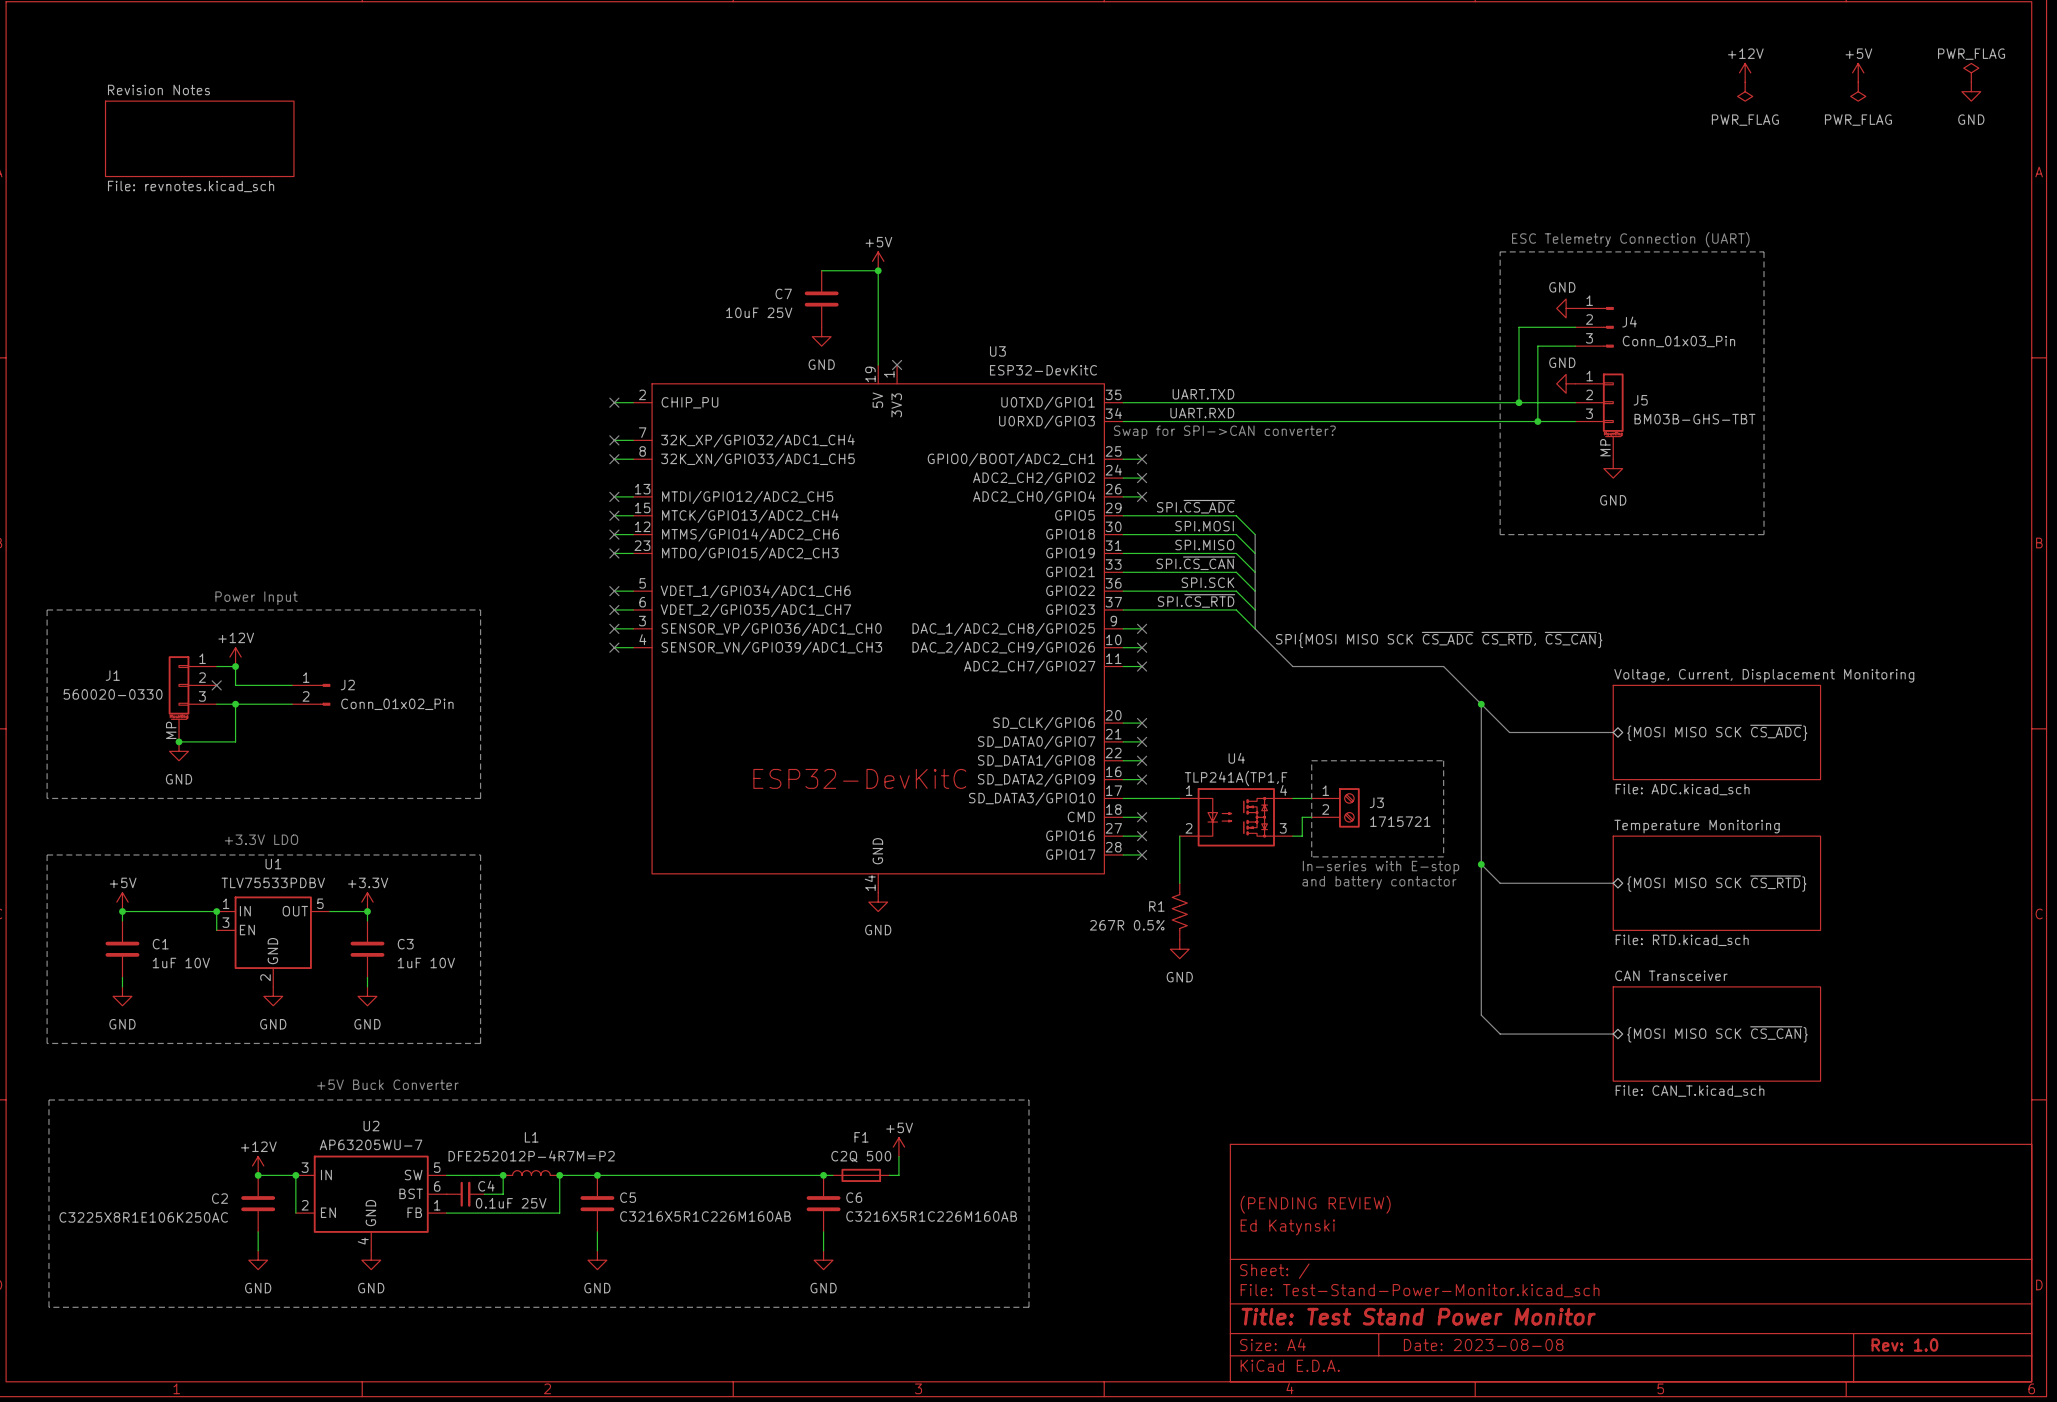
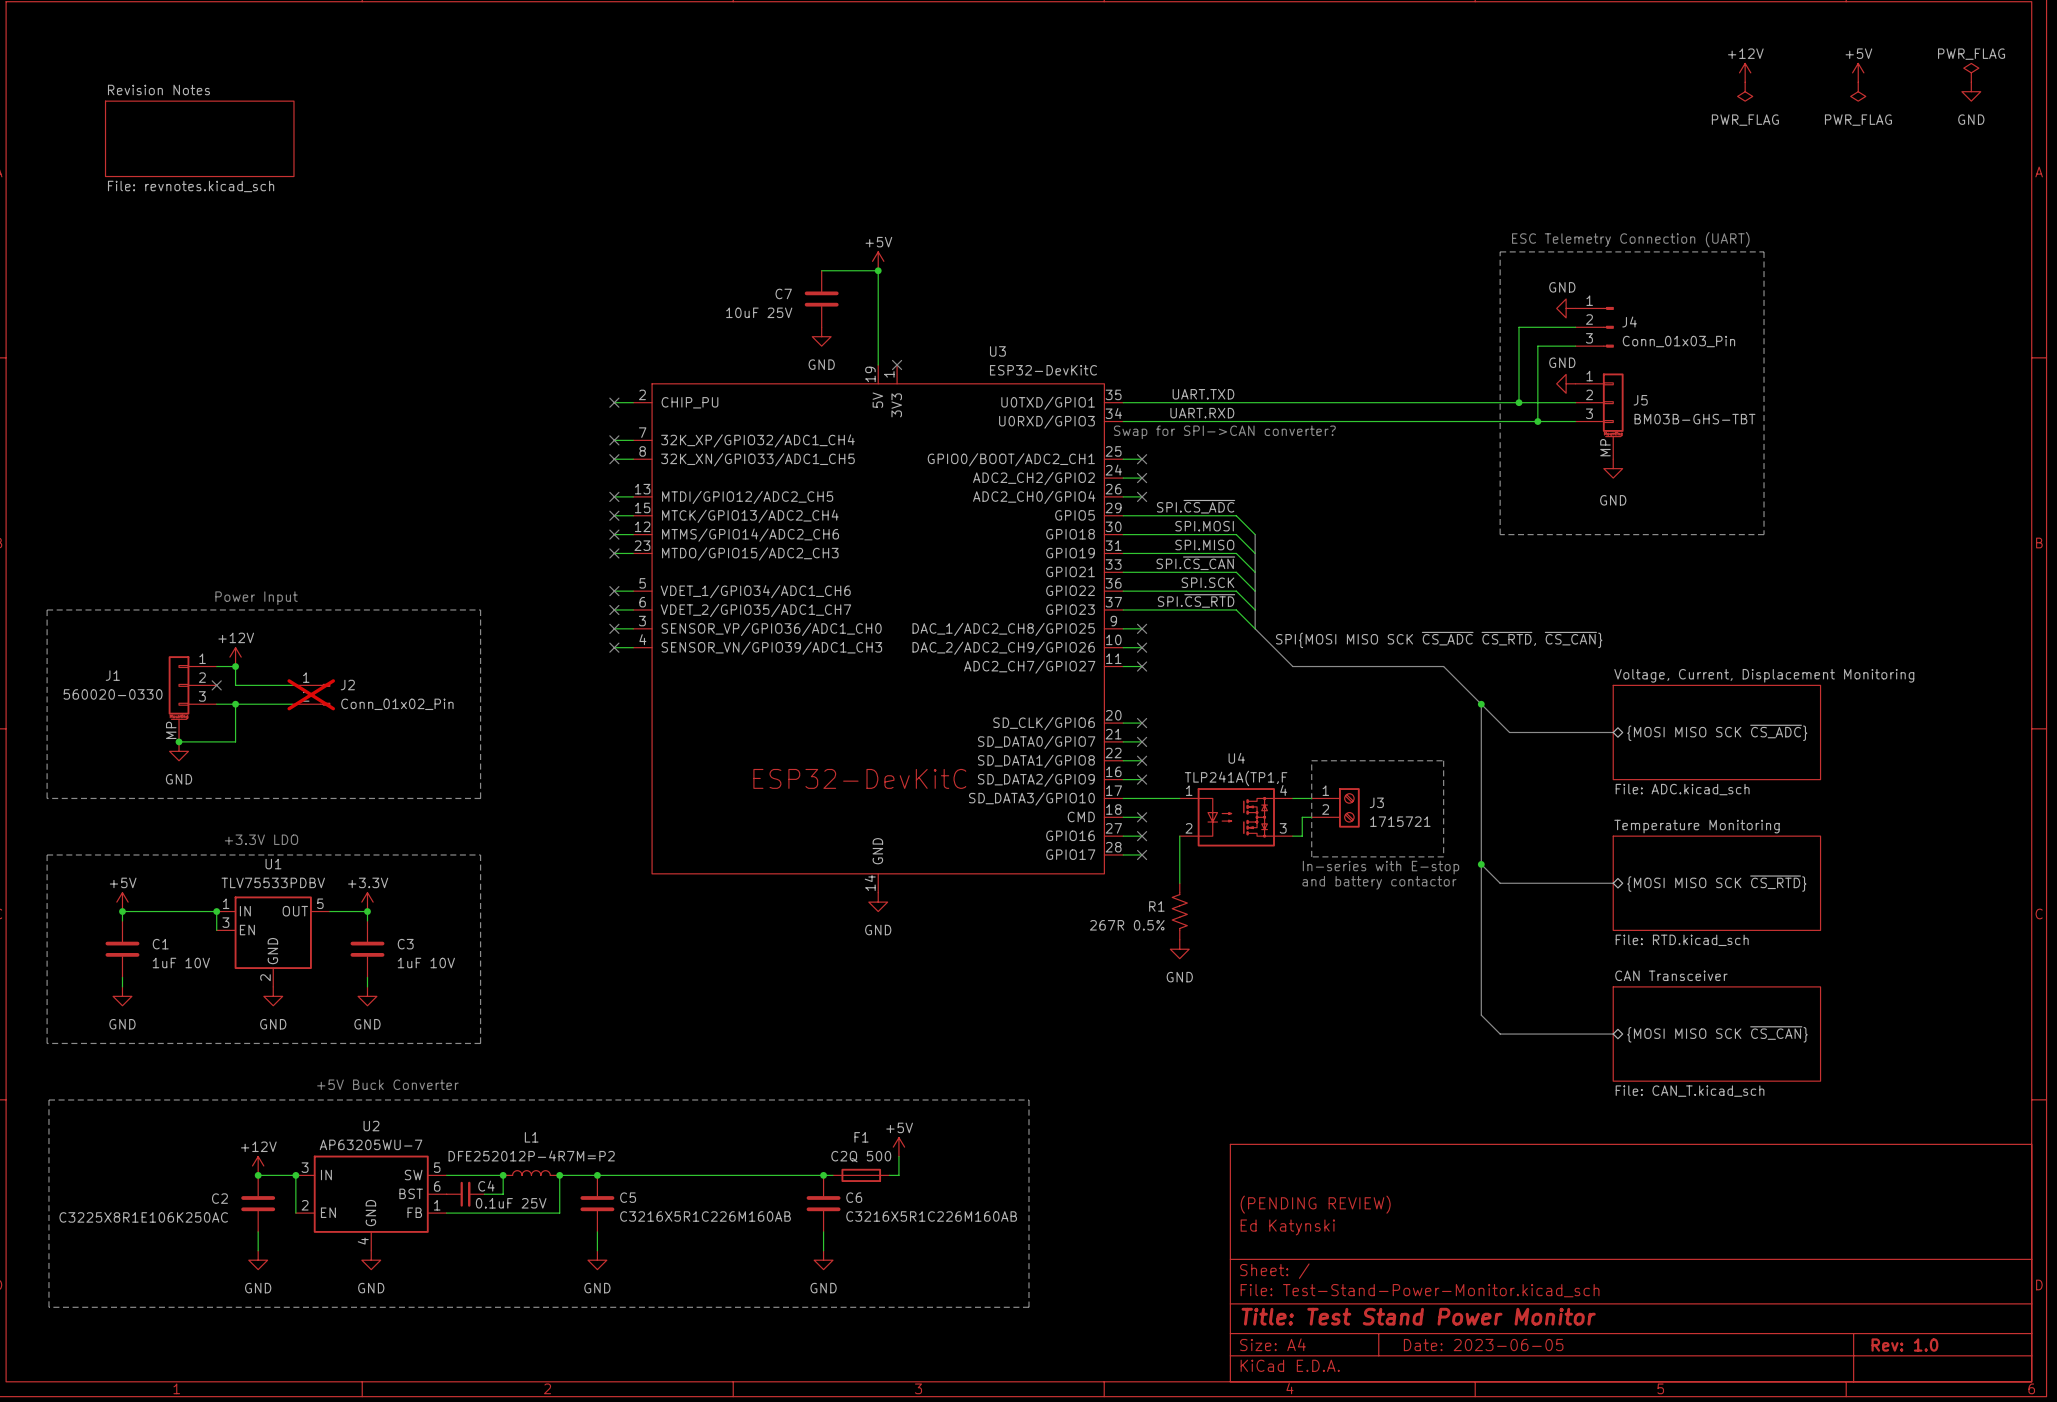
J2 do-not-place cross: none -> (311, 694)
title block: Date: 2023-08-08 (1483, 1345) -> Date: 2023-06-05 (1483, 1345)

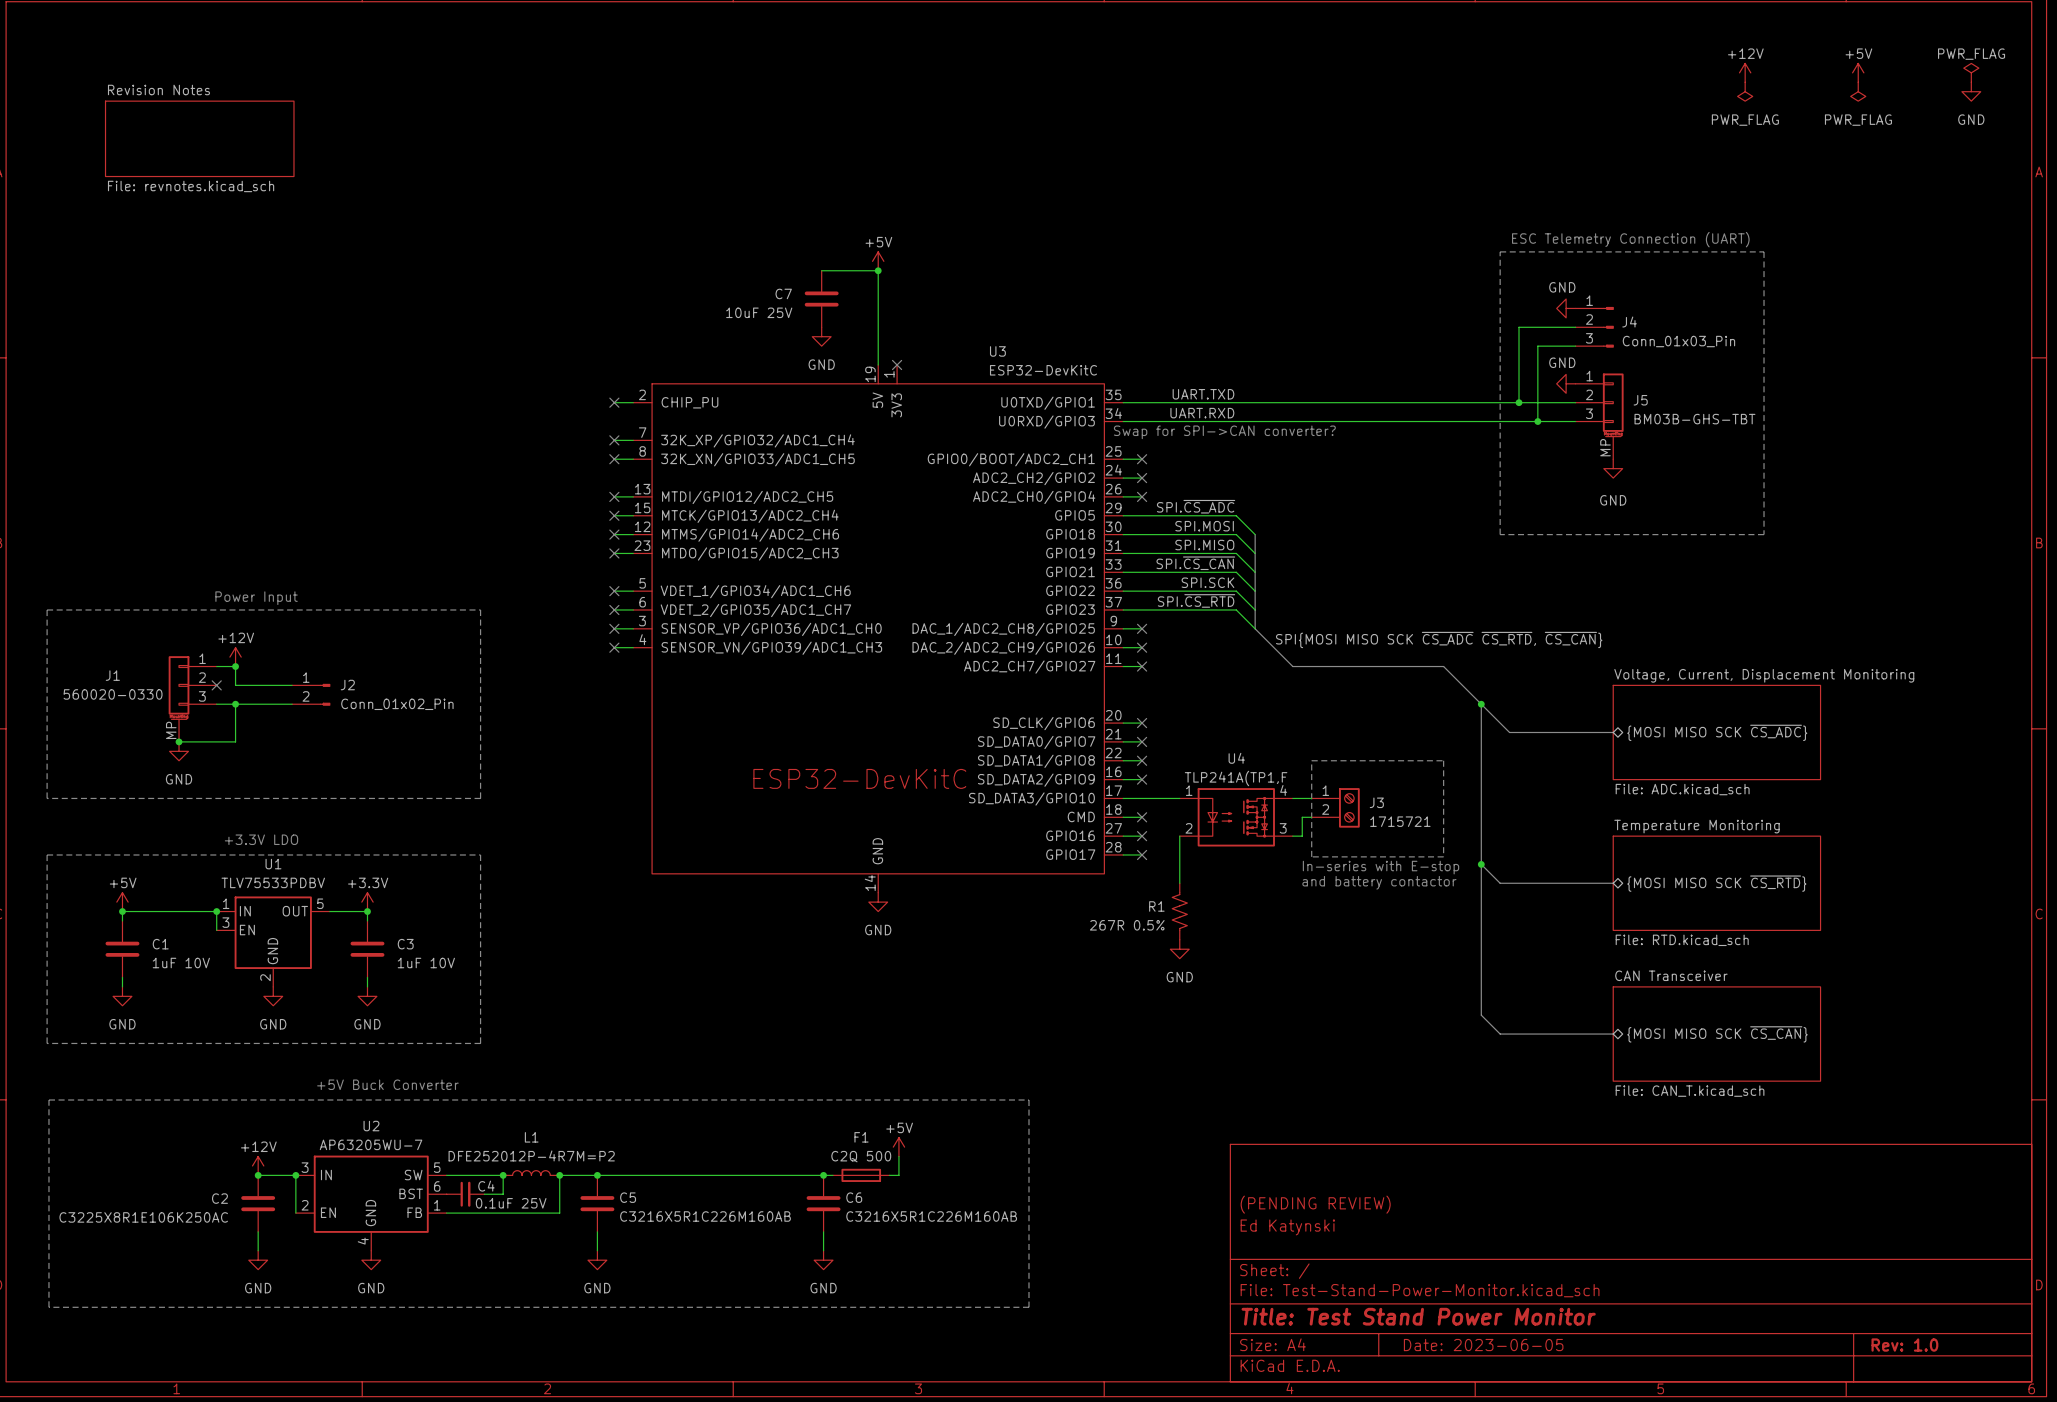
J2 do-not-place cross: (311, 694) -> none

